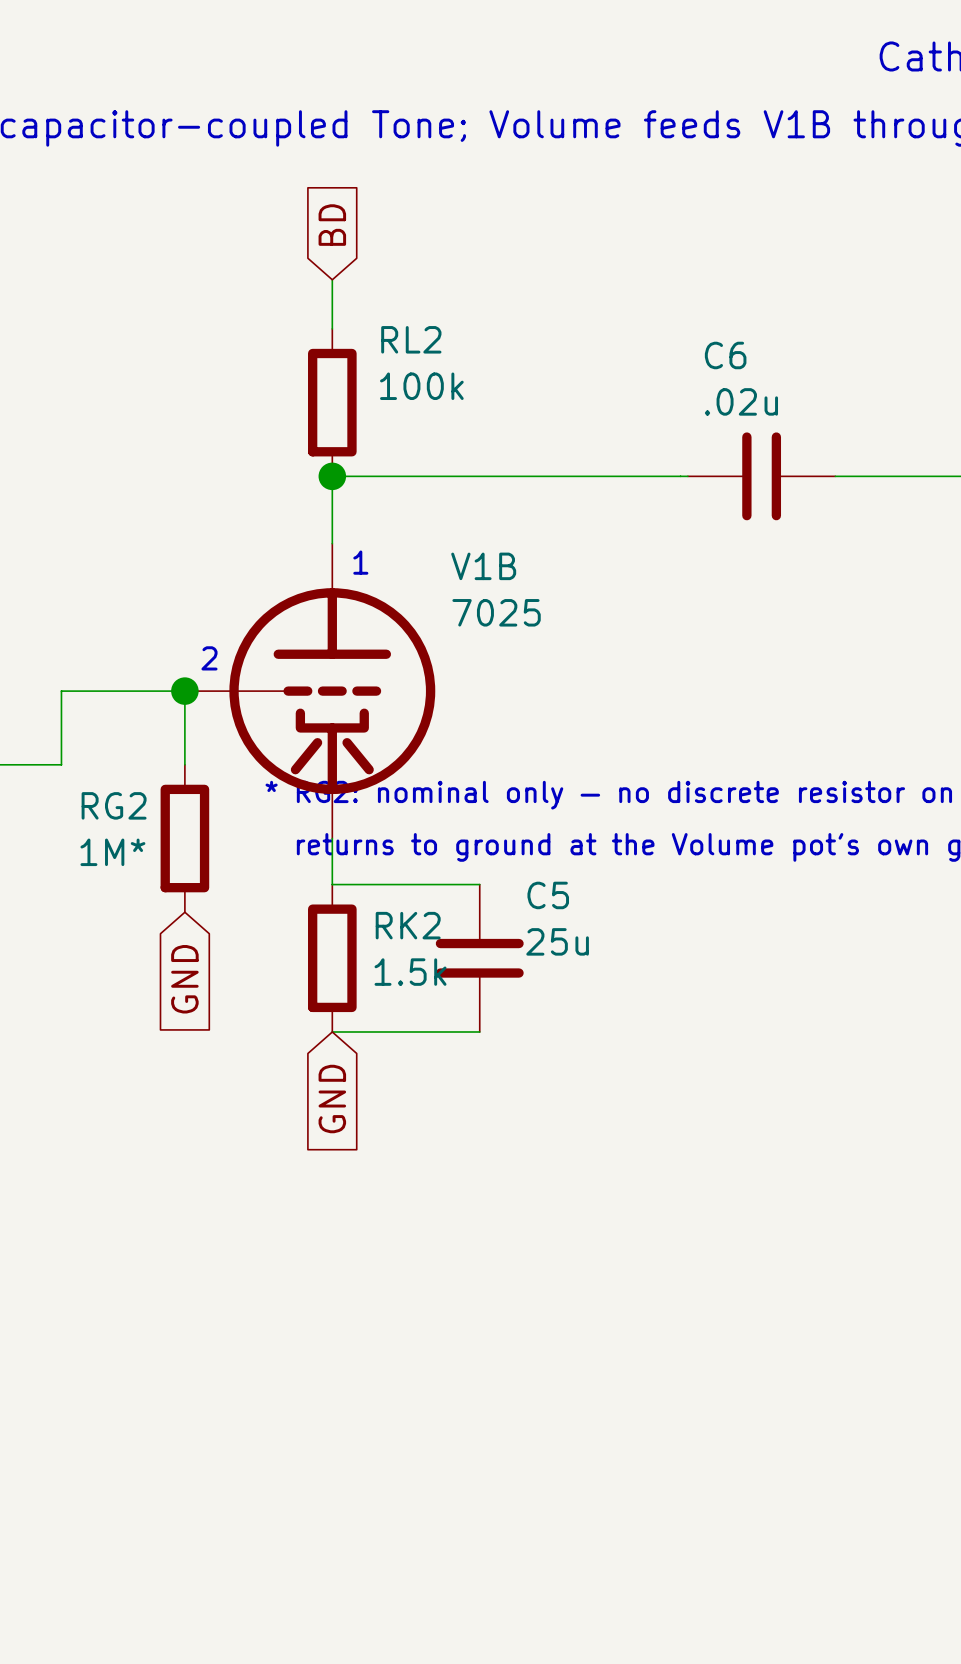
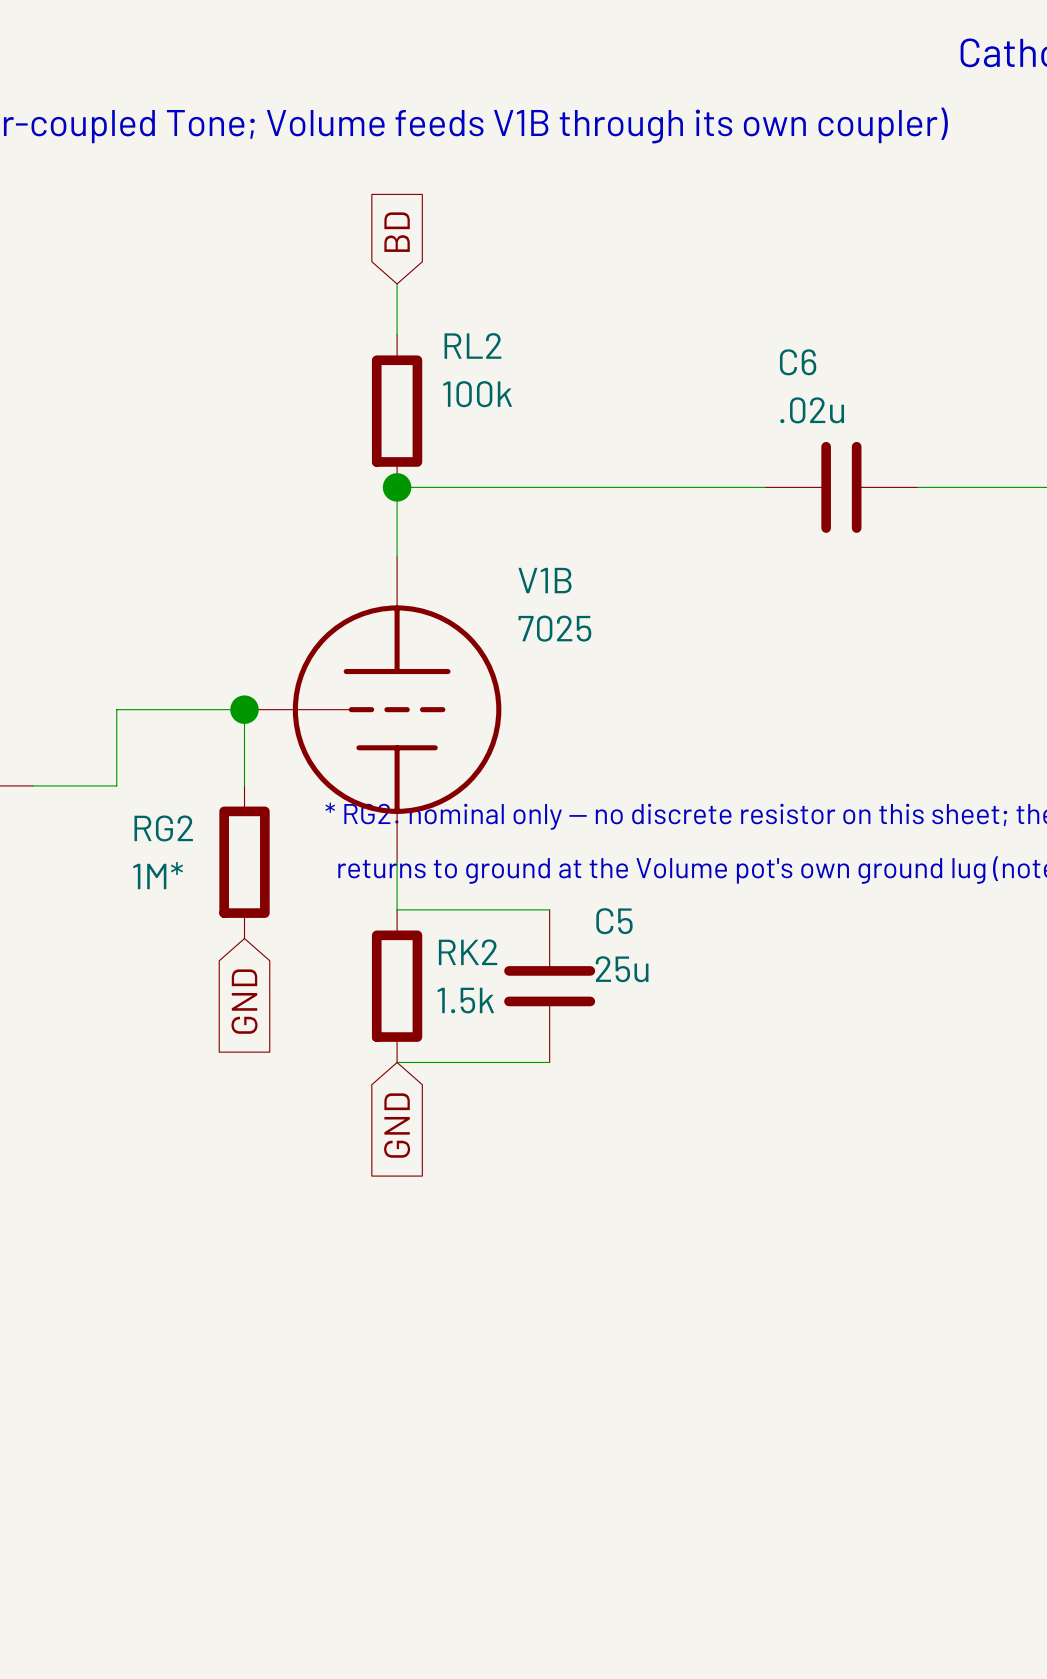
V1B symbol: [184, 543, 436, 839] -> [244, 557, 502, 863]
text: 1 (360, 562) -> none
text: 2 (209, 658) -> none

